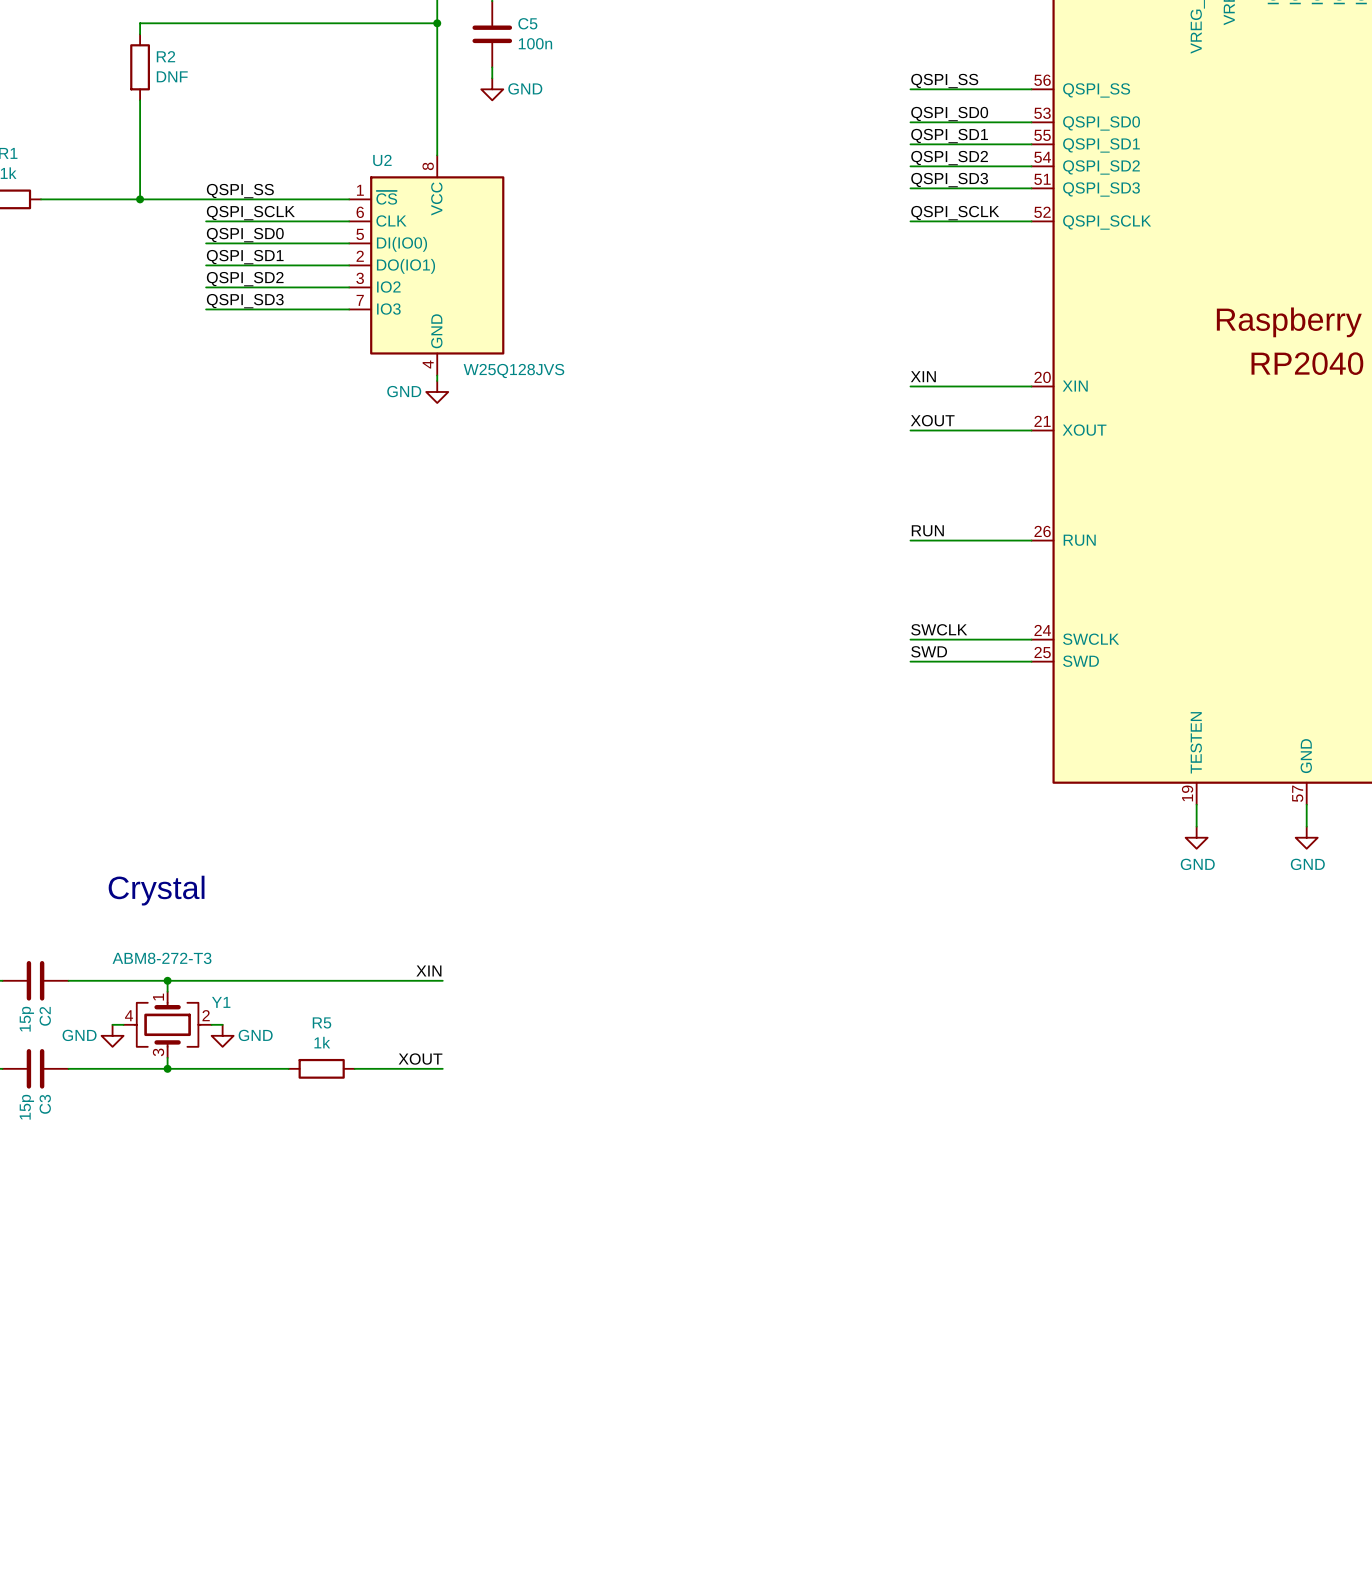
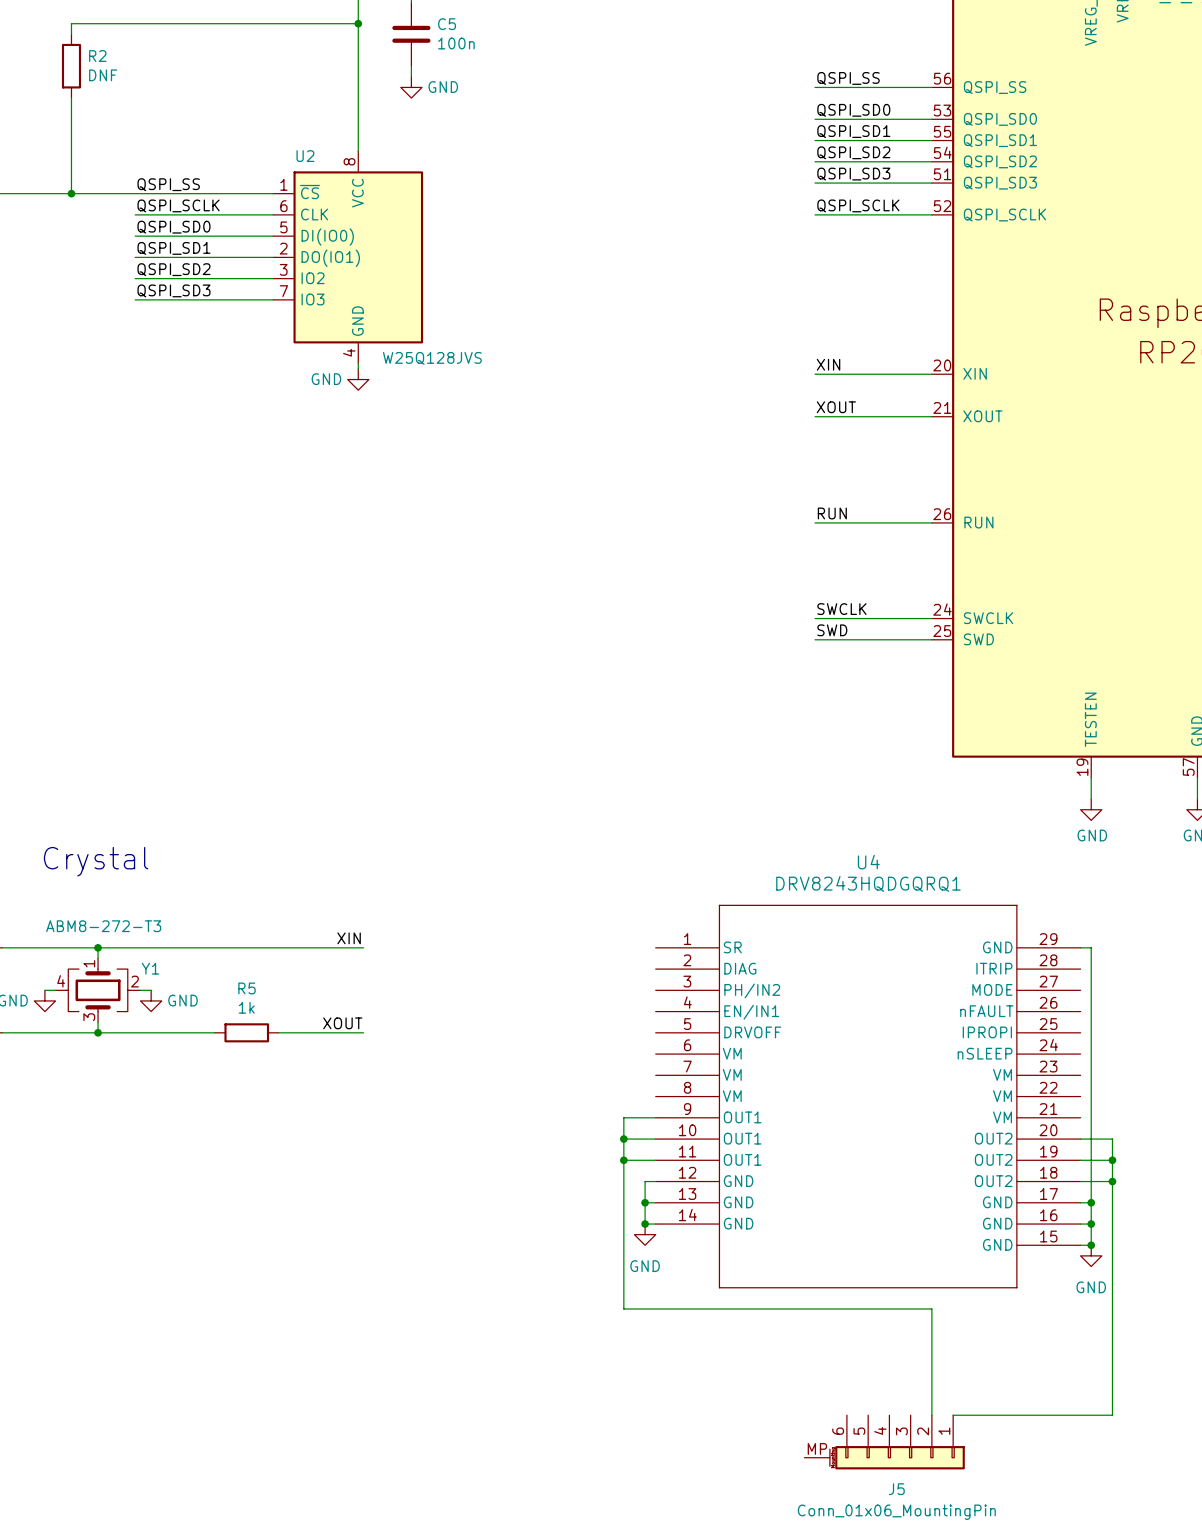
wire: none -> (1080, 947) (1091, 947) (1091, 1245) (1080, 1245)
U4: none -> DRV8243HQDGQRQ1 (868, 1096)
wire: none -> (655, 1117) (623, 1117) (623, 1309) (931, 1309) (931, 1415)
wire: none -> (623, 1139) (655, 1139)
junction: none -> (623, 1139)
wire: none -> (1080, 1139) (1112, 1139) (1112, 1415) (953, 1415)
wire: none -> (623, 1160) (655, 1160)
junction: none -> (623, 1160)
wire: none -> (1080, 1160) (1112, 1160)
junction: none -> (1112, 1160)
wire: none -> (655, 1181) (645, 1181) (645, 1224) (655, 1224)
wire: none -> (1080, 1181) (1112, 1181)
junction: none -> (1112, 1181)
wire: none -> (645, 1202) (655, 1202)
junction: none -> (645, 1202)
wire: none -> (1080, 1202) (1091, 1202)
junction: none -> (1091, 1202)
junction: none -> (645, 1224)
wire: none -> (1080, 1224) (1091, 1224)
junction: none -> (1091, 1224)
power symbol: none -> GND (645, 1234)
junction: none -> (1091, 1245)
power symbol: none -> GND (1091, 1255)
J5: none -> Conn_01x06_MountingPin (884, 1442)

